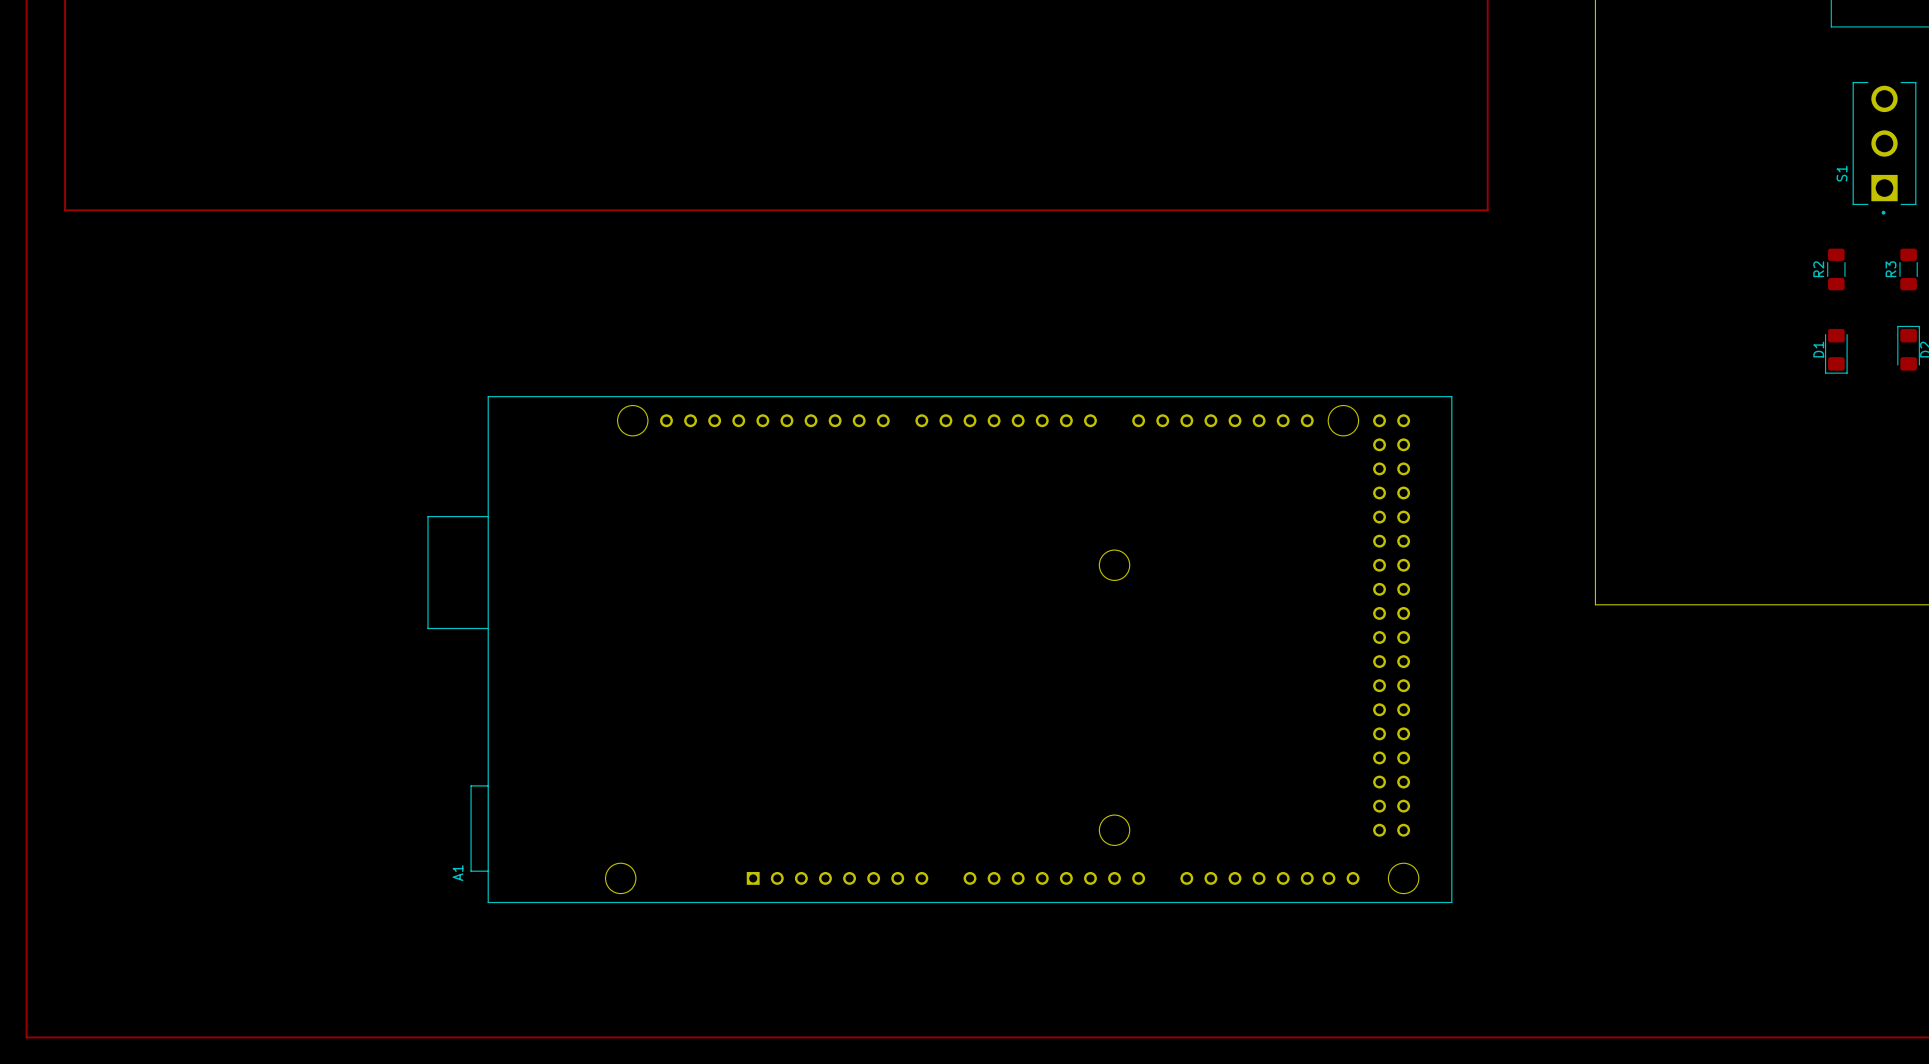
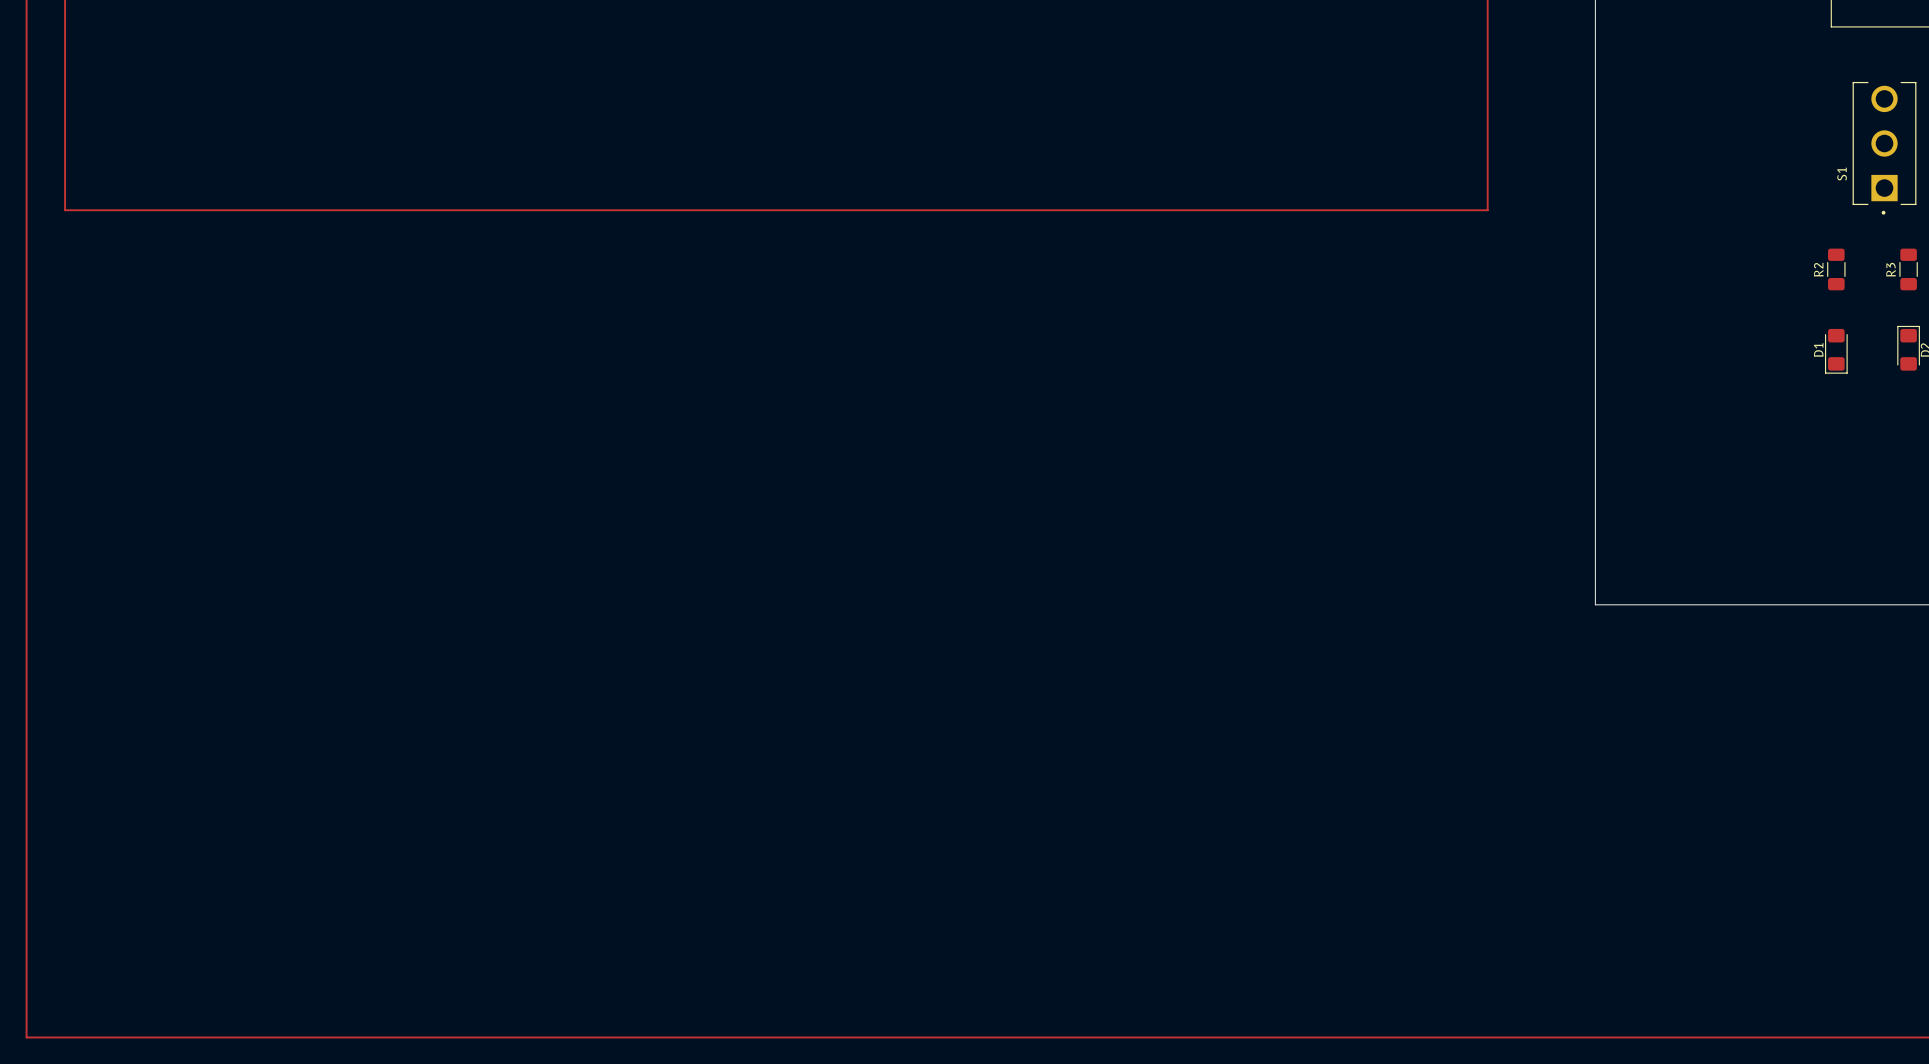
A1: (939, 649) -> none

